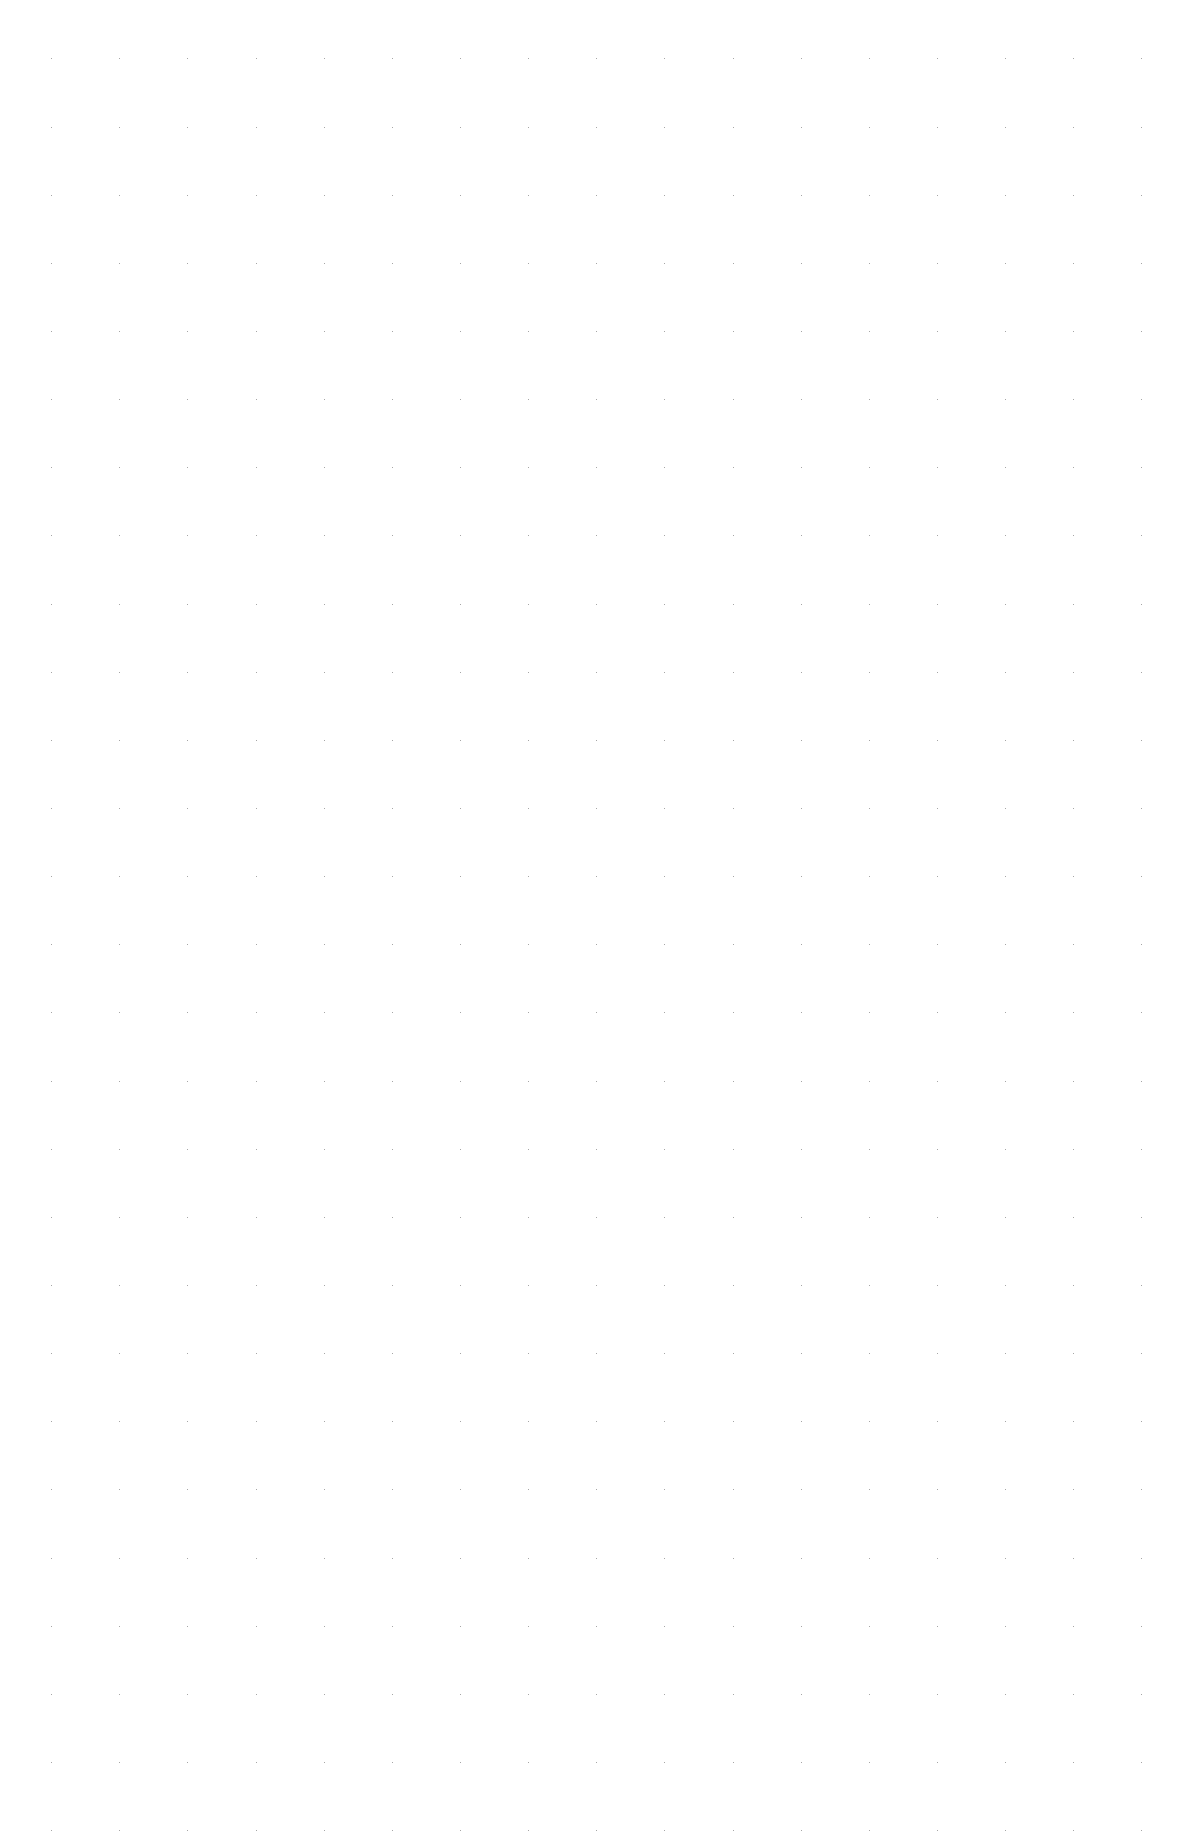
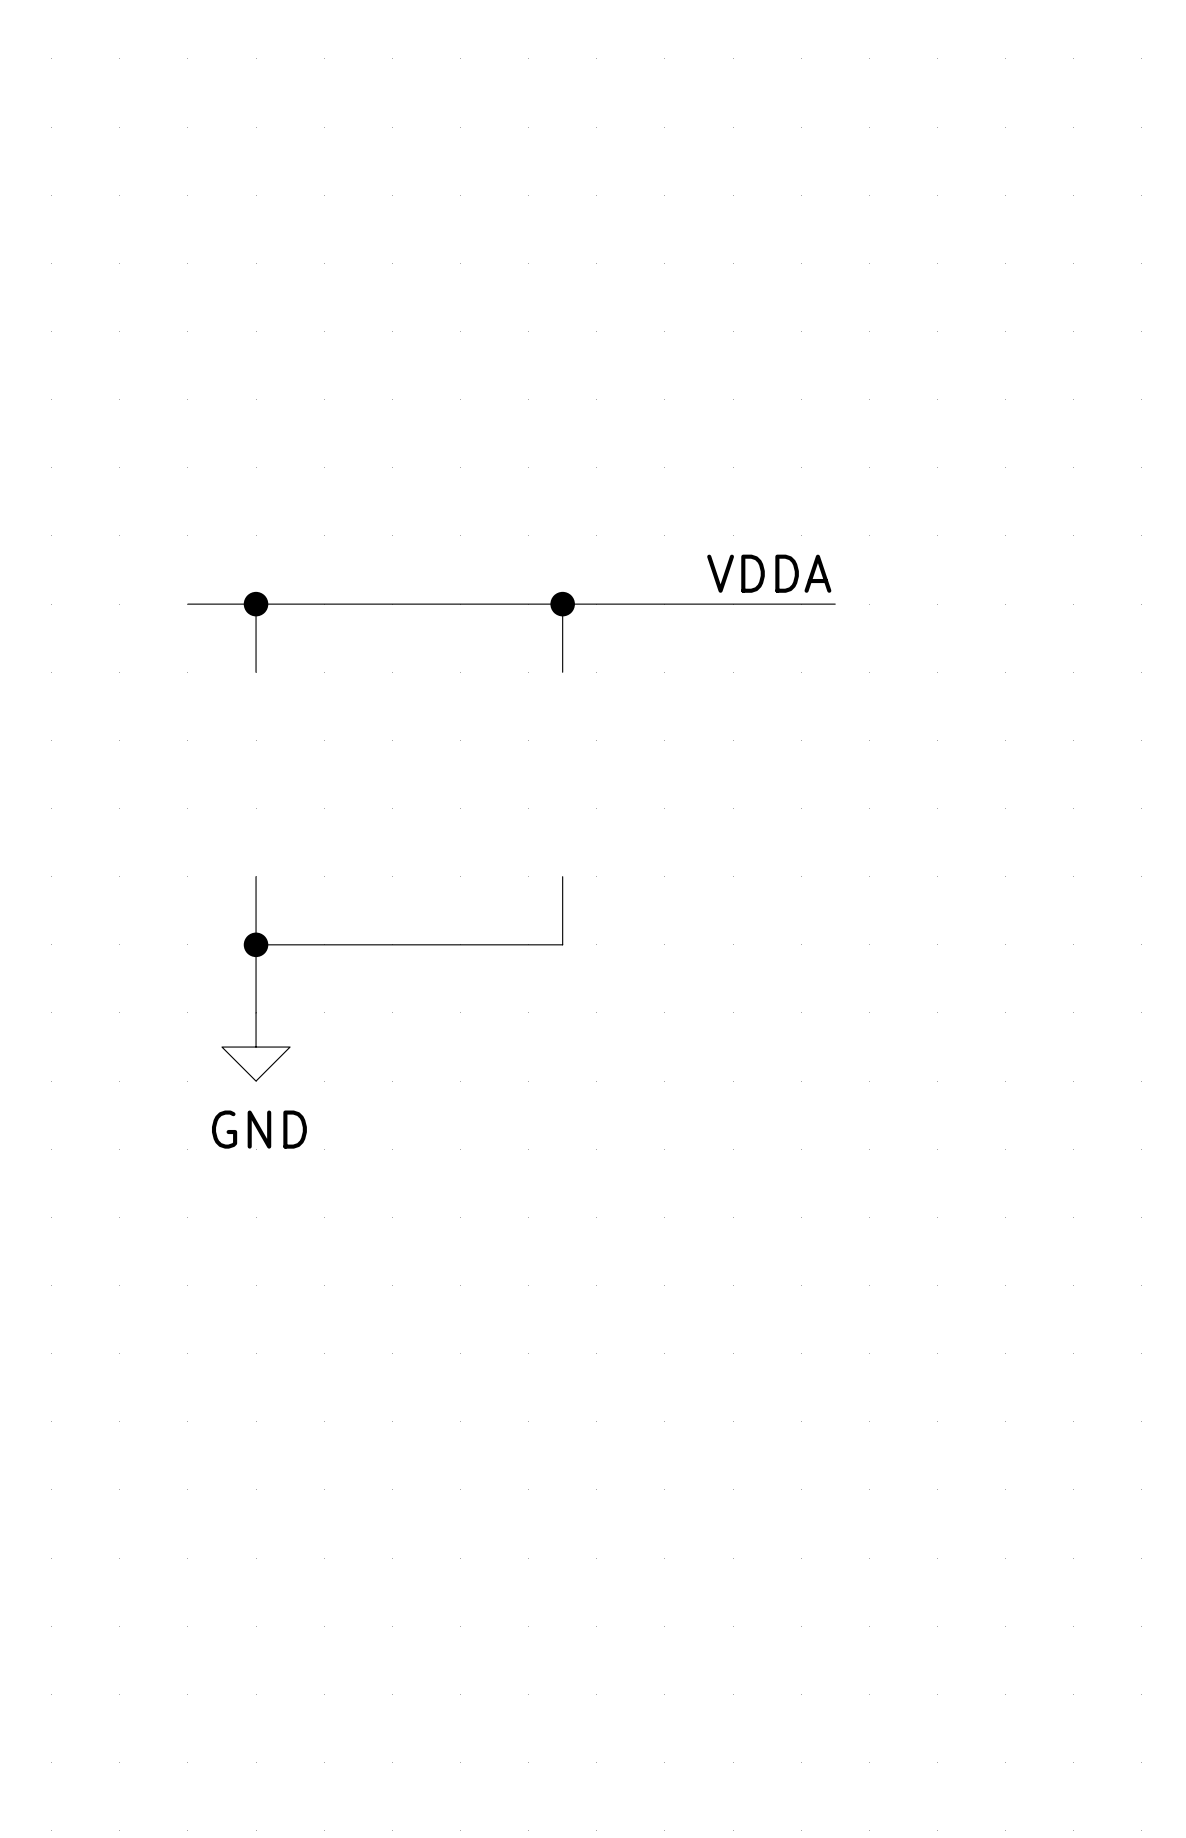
label: none -> VDDA (769, 573)
wire: none -> (187, 604) (835, 604)
wire: none -> (256, 604) (256, 672)
junction: none -> (256, 604)
wire: none -> (562, 604) (562, 672)
junction: none -> (562, 604)
wire: none -> (256, 876) (256, 1012)
wire: none -> (562, 876) (562, 944) (256, 944)
junction: none -> (256, 944)
power symbol: none -> GND (256, 1047)

